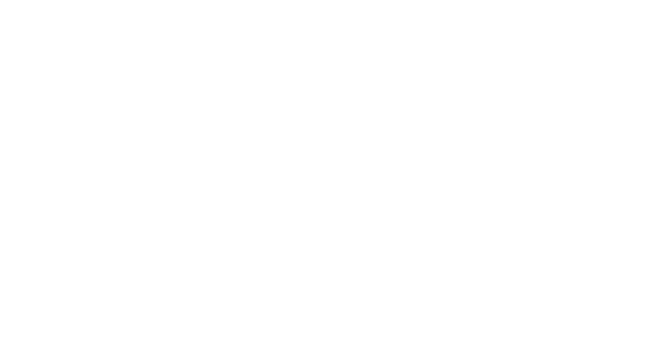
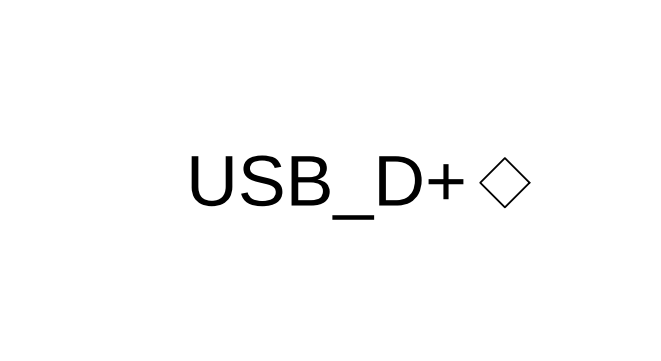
hierarchical label: none -> USB_D+ (327, 187)

